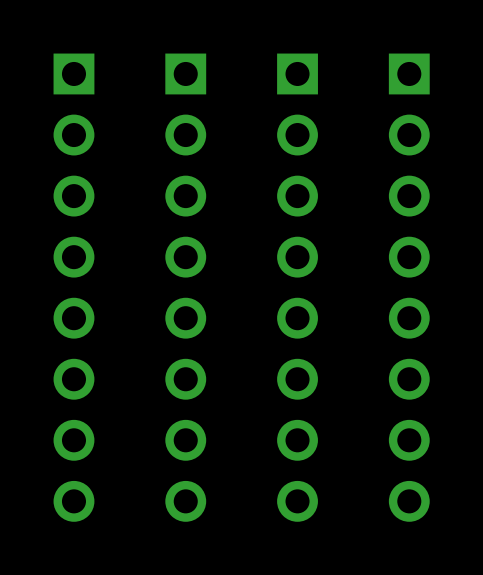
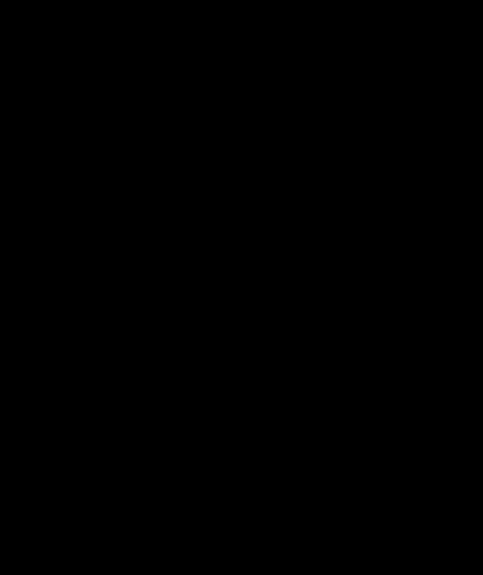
part: (73, 287) -> none
part: (185, 287) -> none
part: (297, 287) -> none
part: (409, 287) -> none

